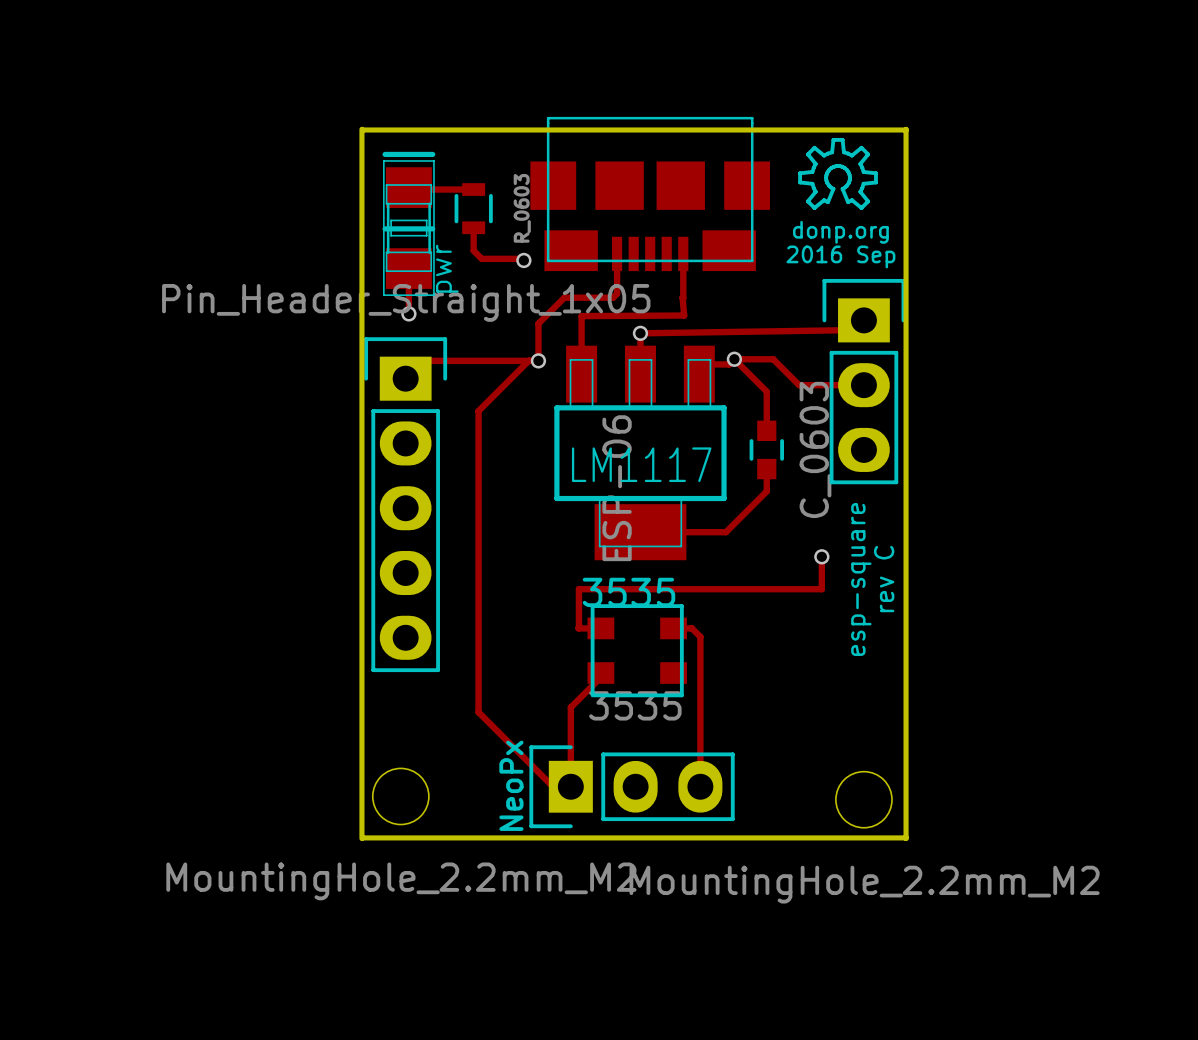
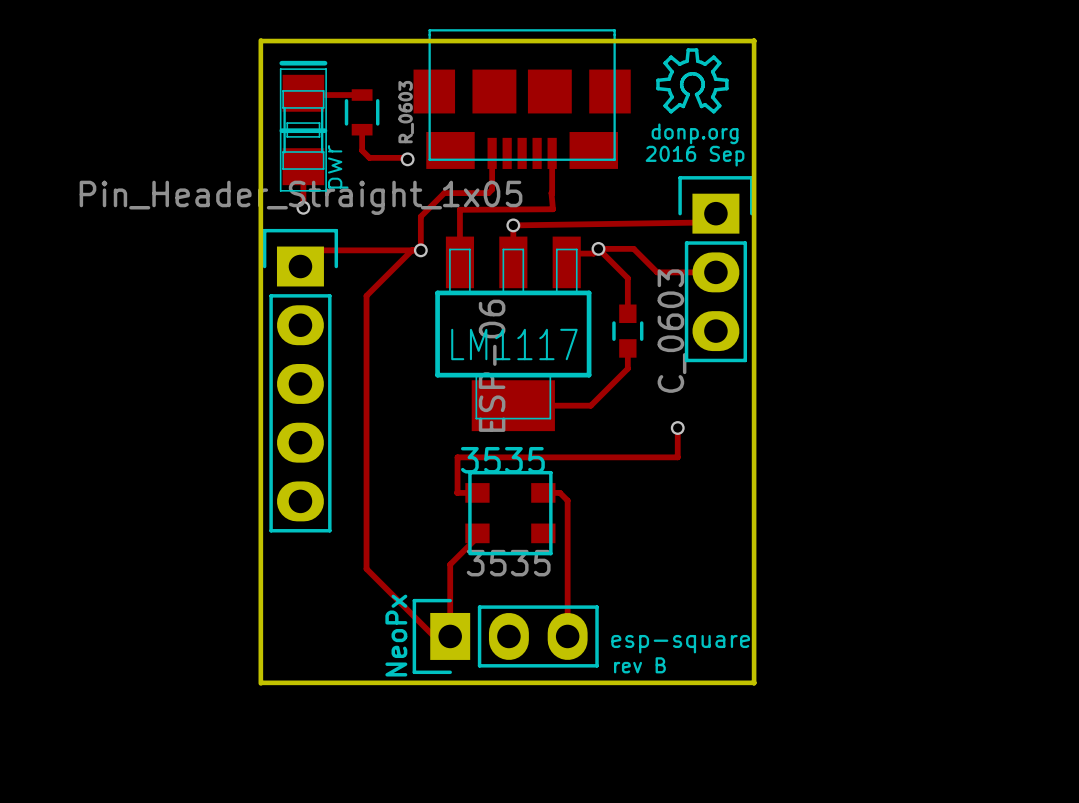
text rotation: 0° (861, 579) -> 90° clockwise (680, 644)
text position: esp-square (861, 579) -> esp-square (680, 644)
text: rev C (884, 579) -> none
part: MountingHole_2.2mm_M2 (400, 796) -> none
part: MountingHole_2.2mm_M2 (863, 799) -> none
text: none -> rev B (639, 665)

